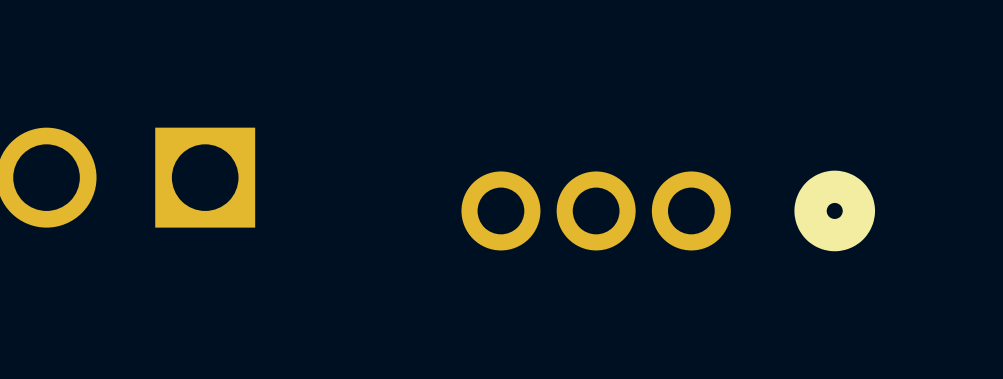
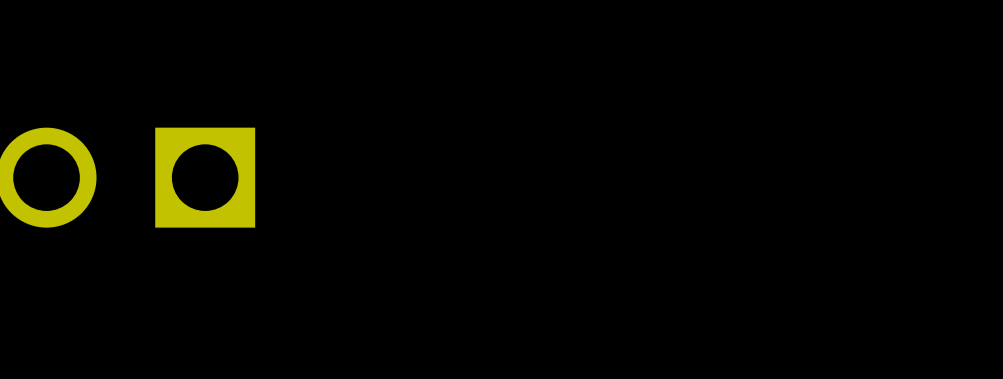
part: (668, 210) -> none

